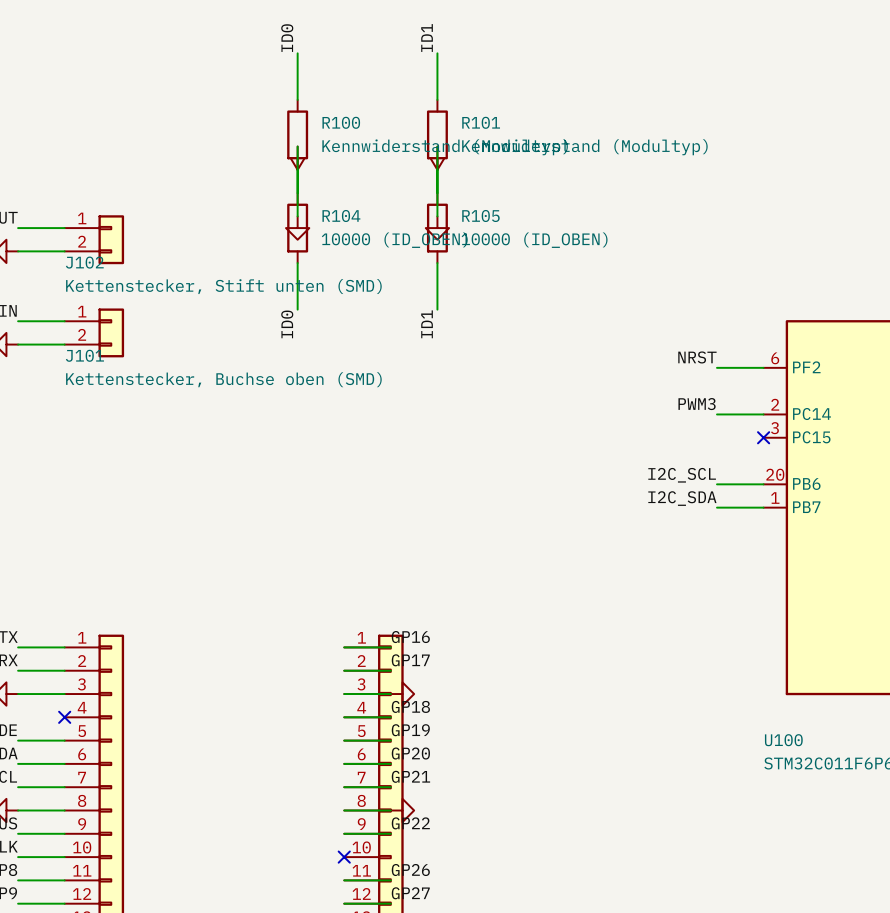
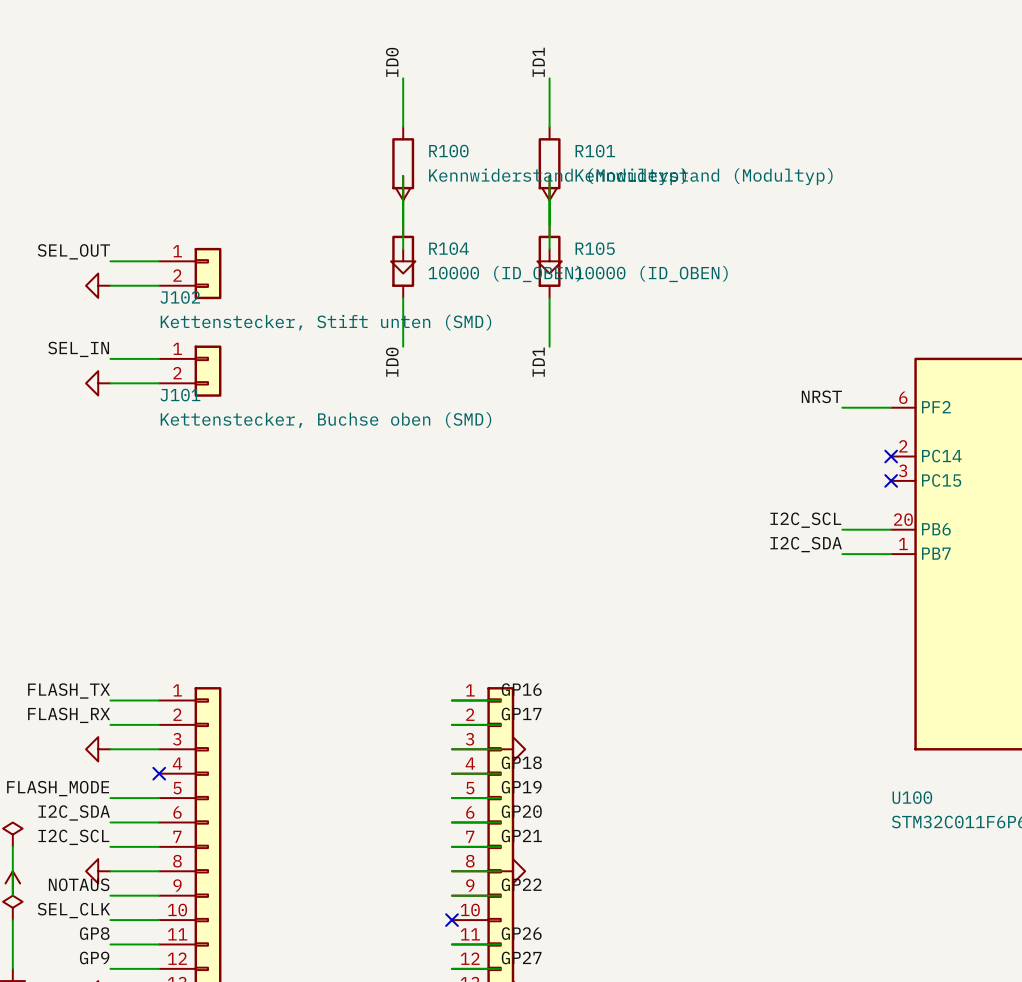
label: PWM3 (697, 404) -> none
wire: (717, 414) (763, 414) -> none
no-connect mark: none -> (891, 456)

